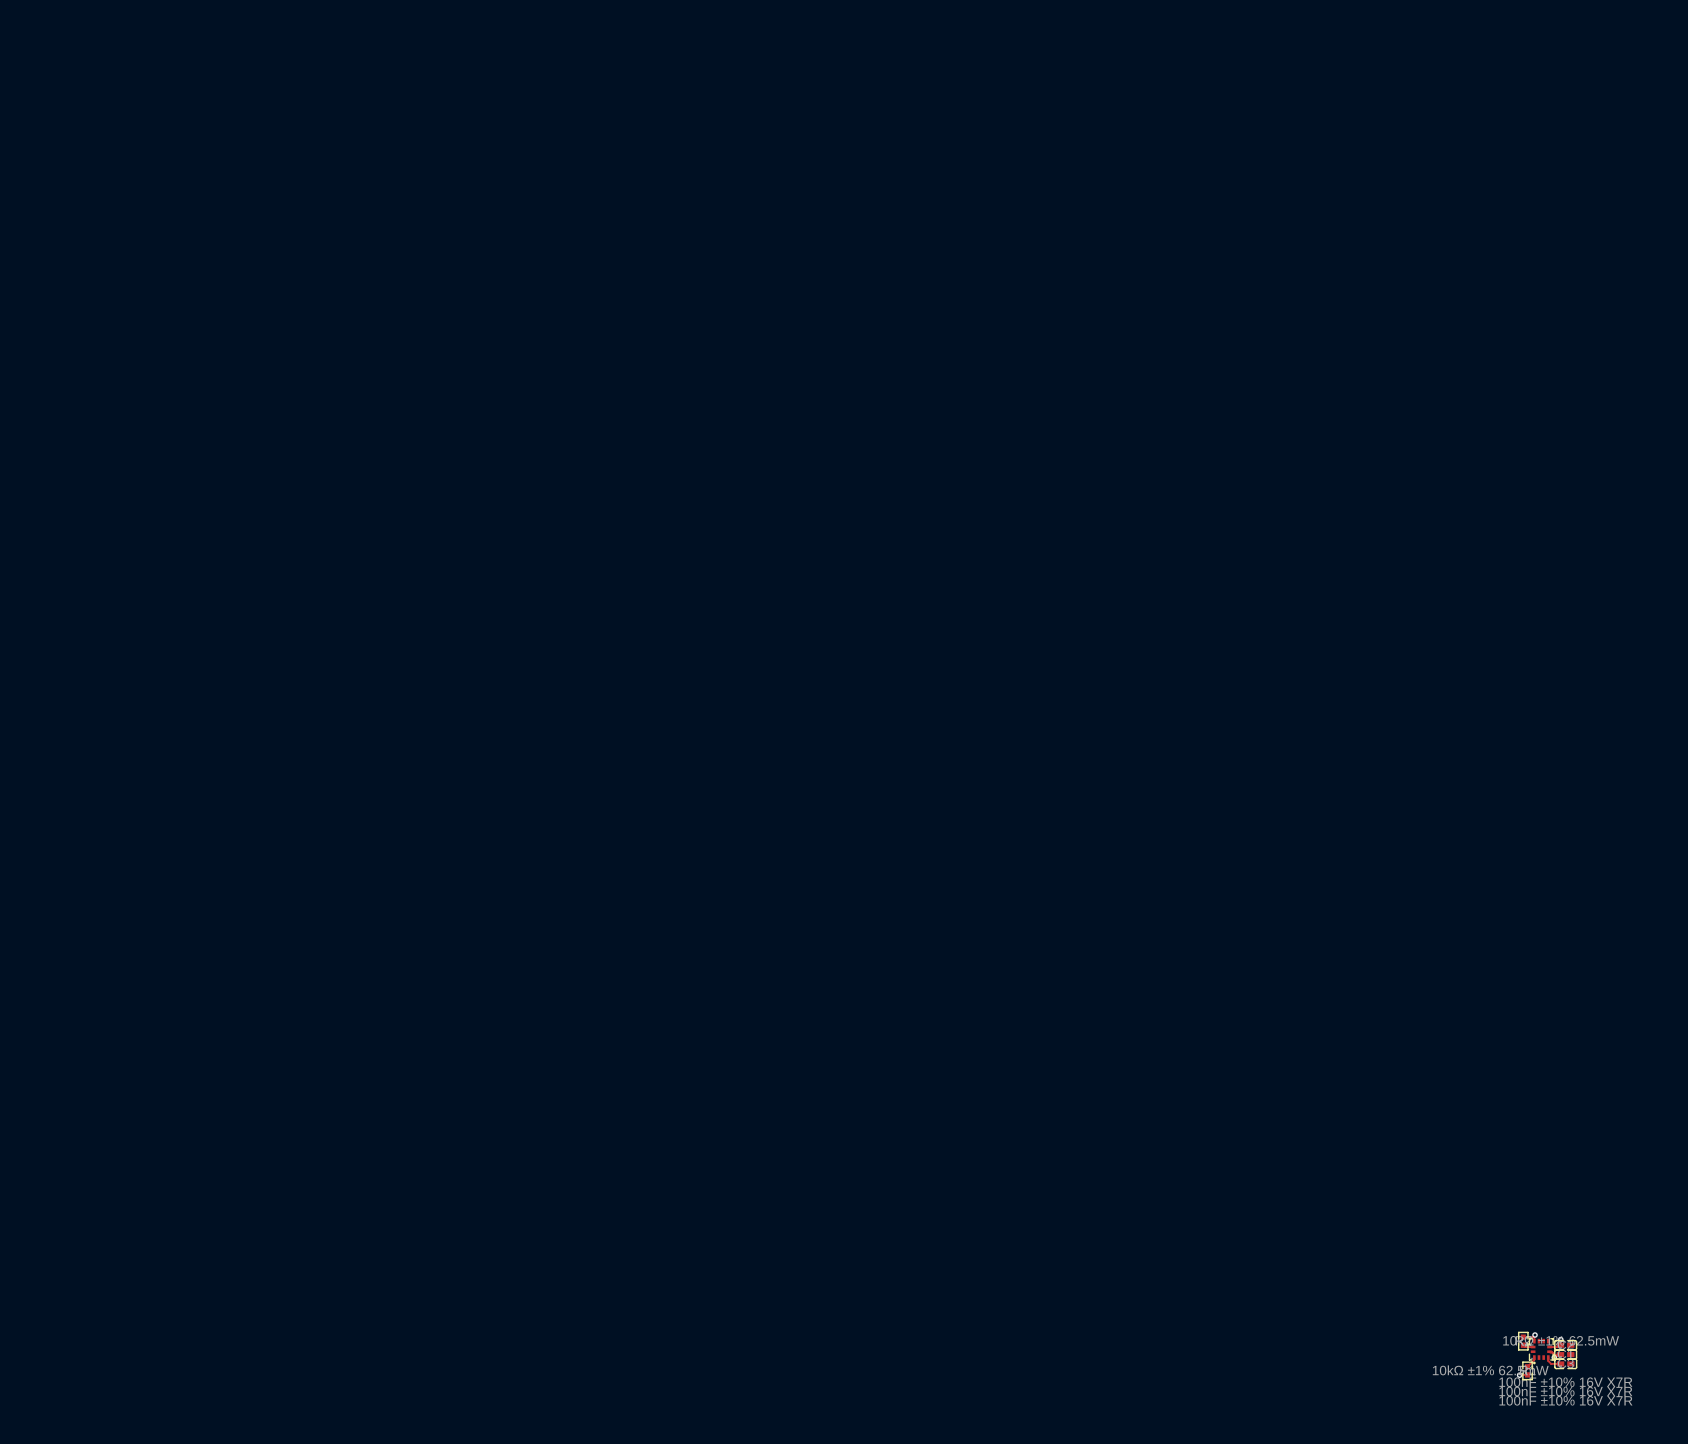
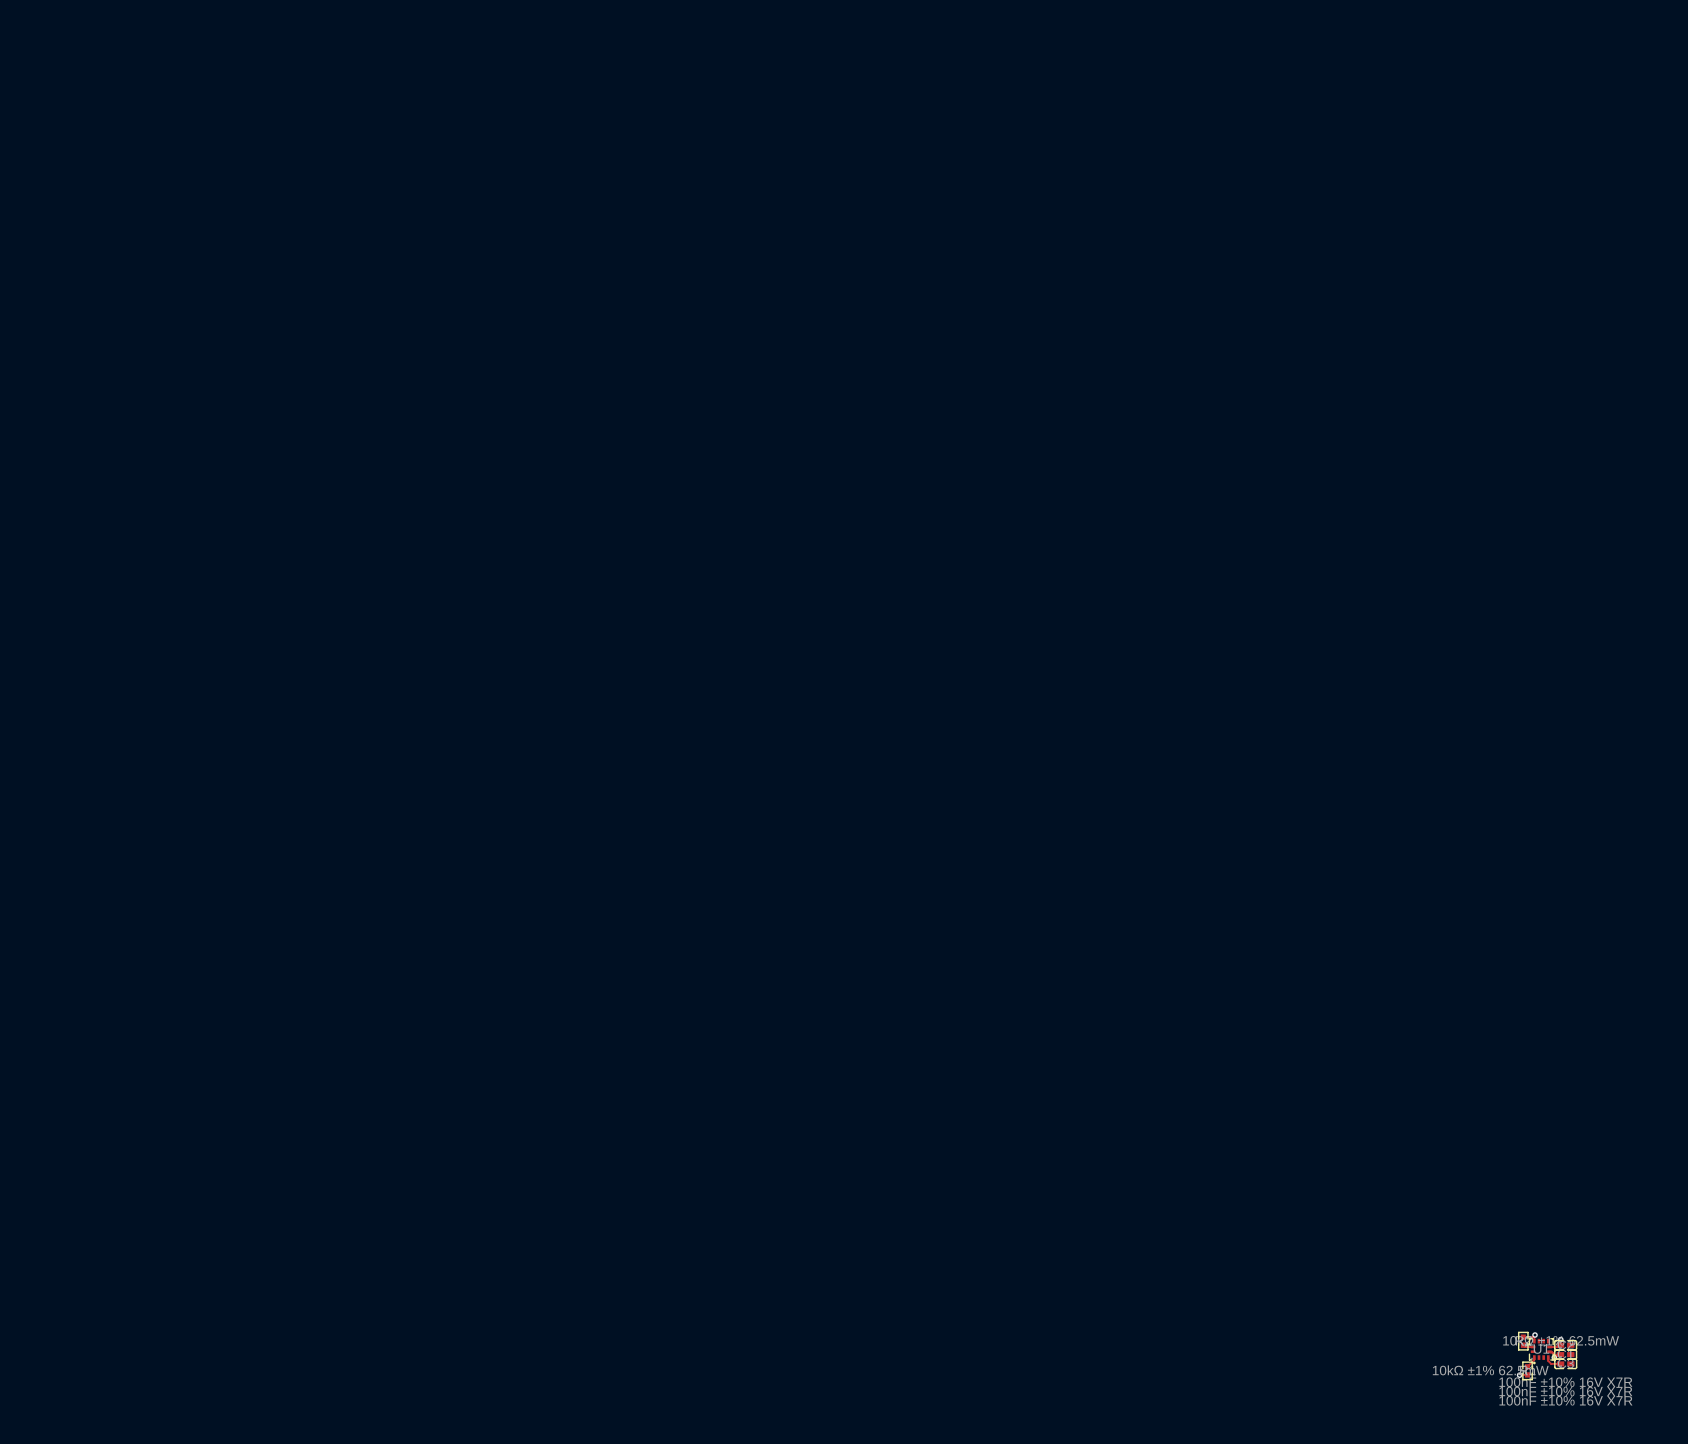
U1 name: none -> U1 (1541, 1349)

